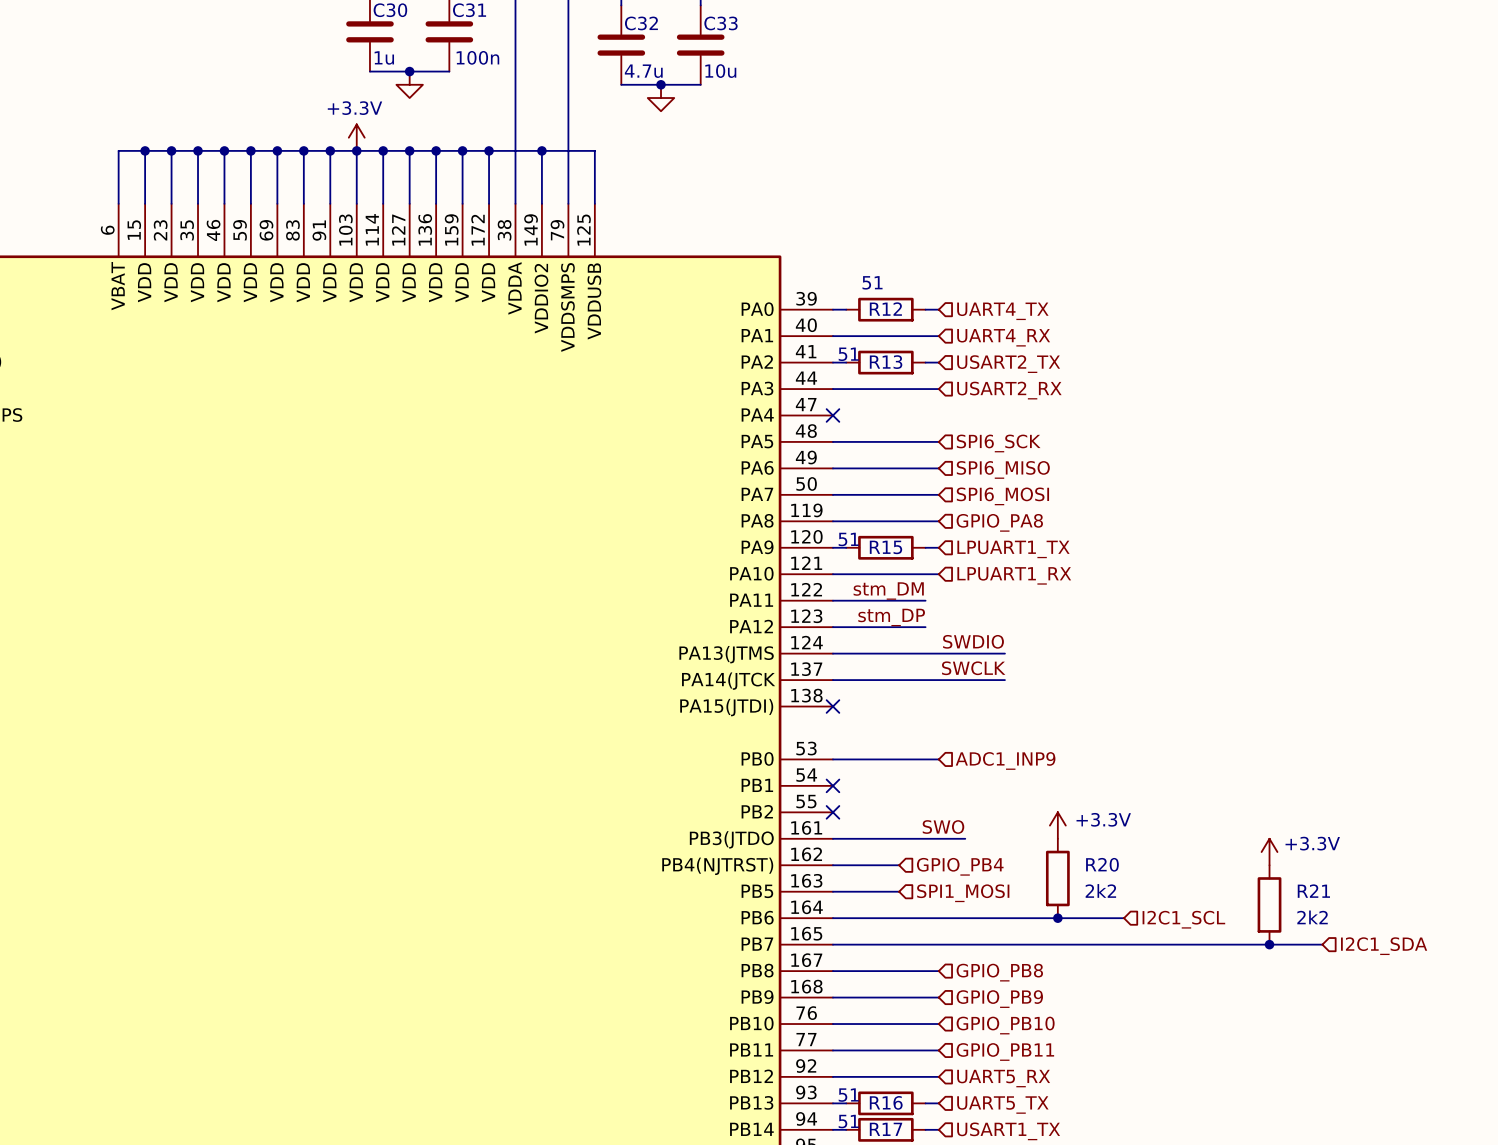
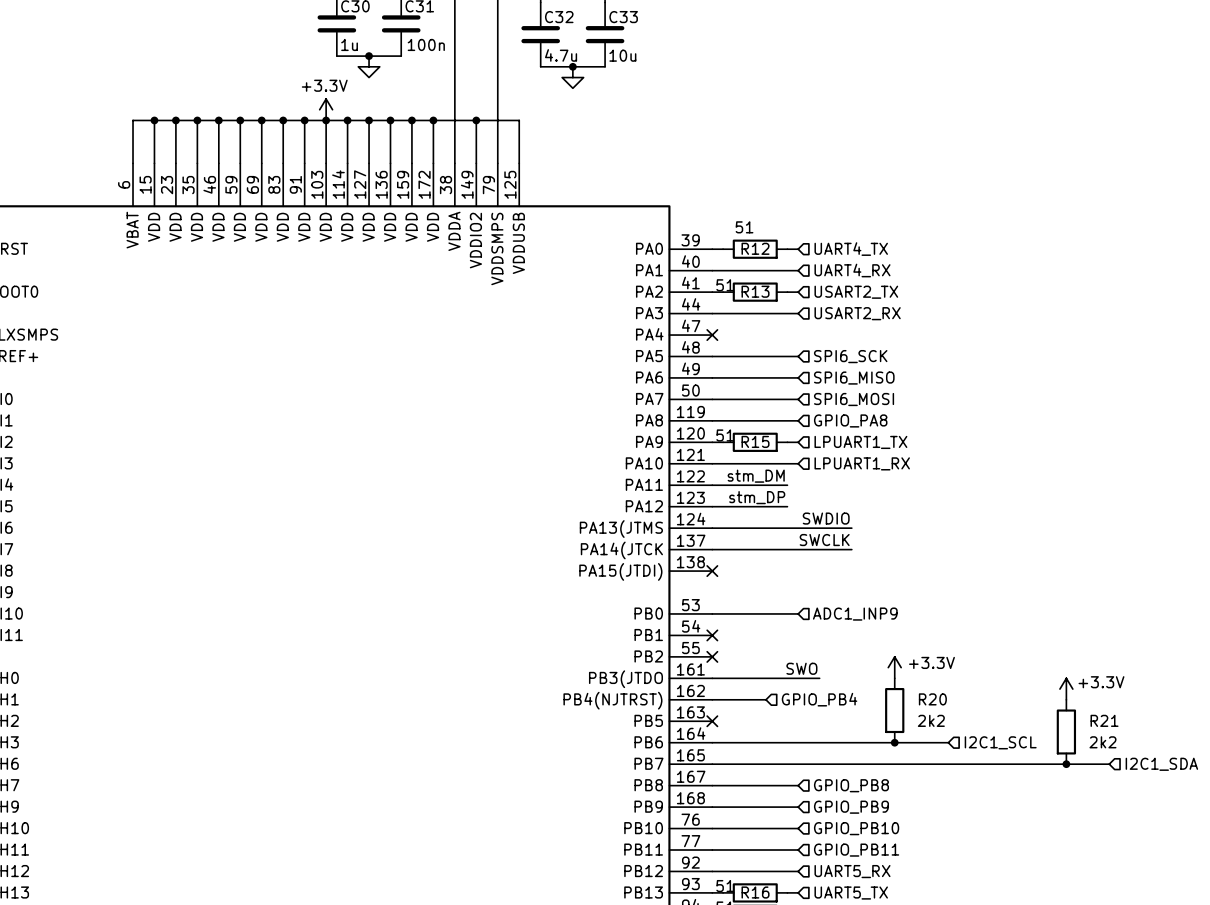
wire: (832, 891) (899, 891) -> none
no-connect mark: none -> (712, 721)
hierarchical label: SPI1_MOSI (963, 893) -> none

